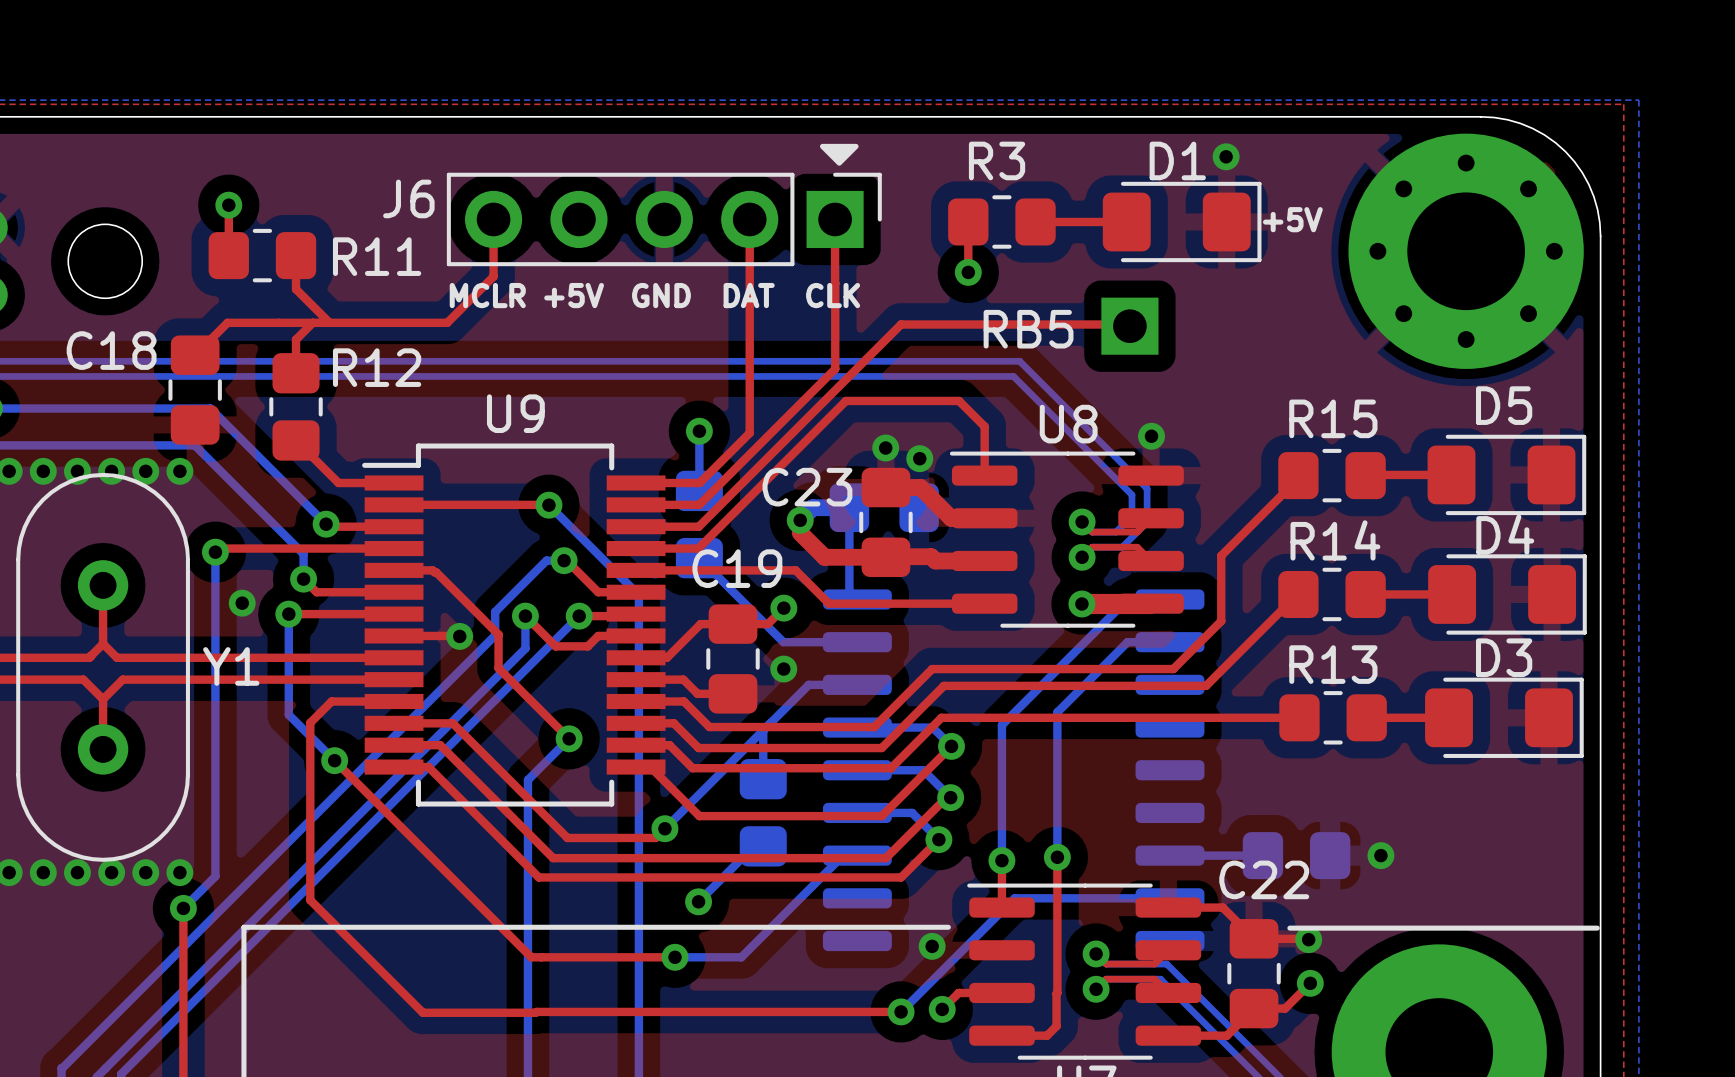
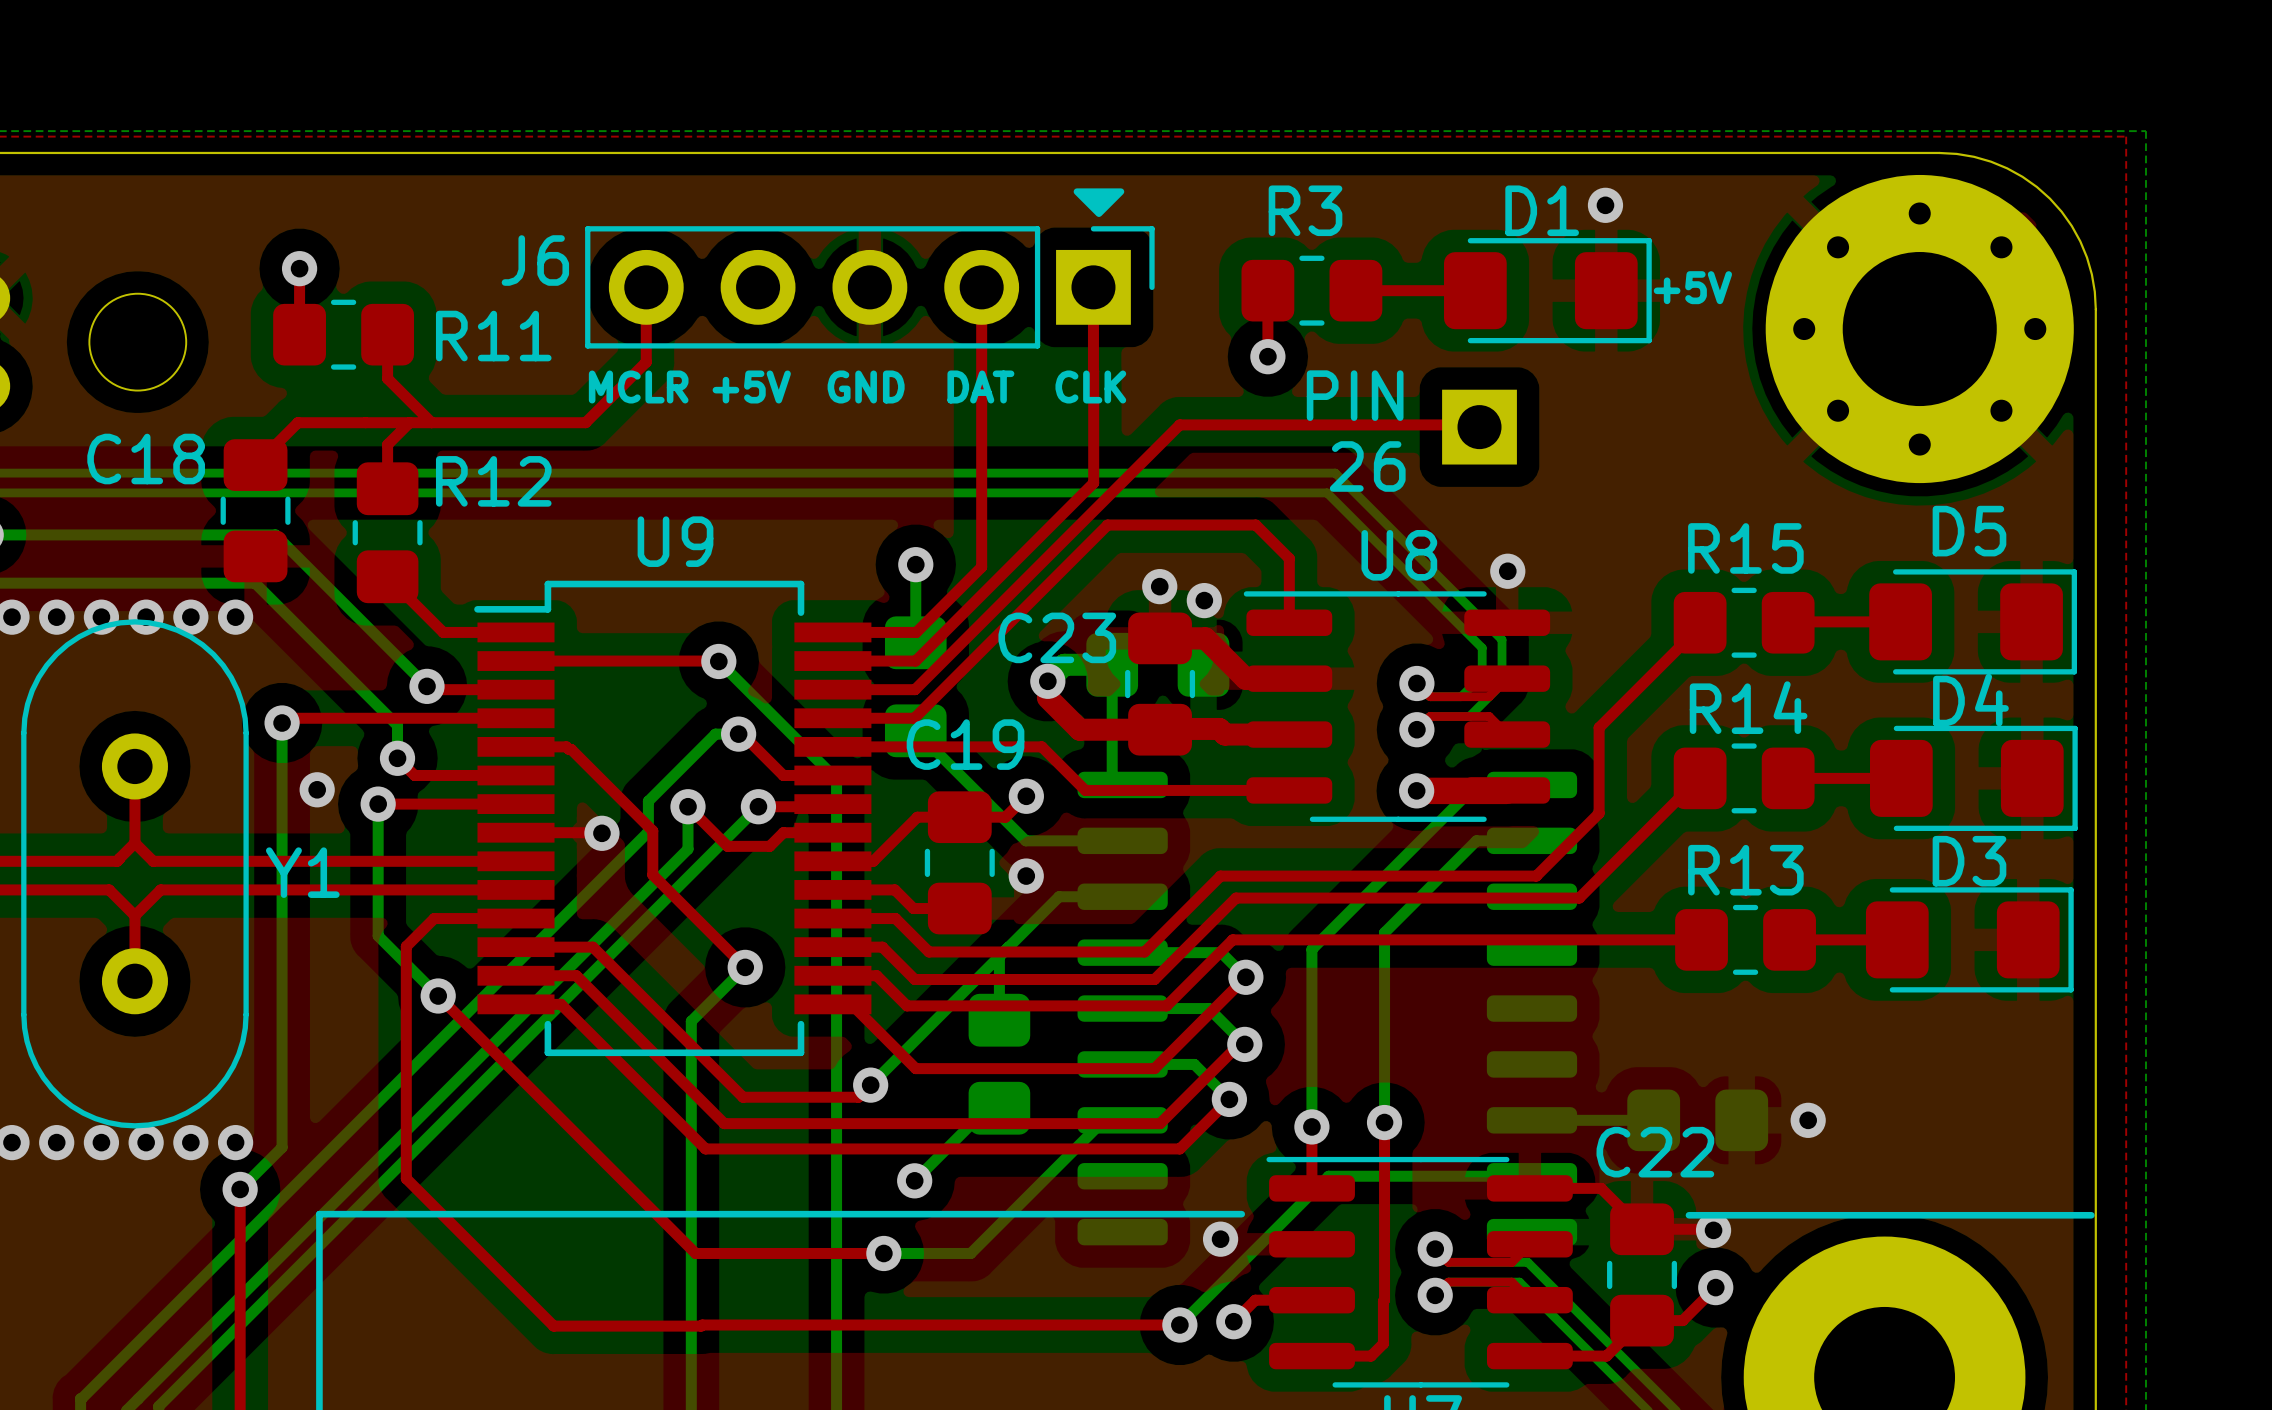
text: none -> PIN (1355, 395)
text: RB5 (1028, 329) -> none
text: none -> 26 (1367, 466)

